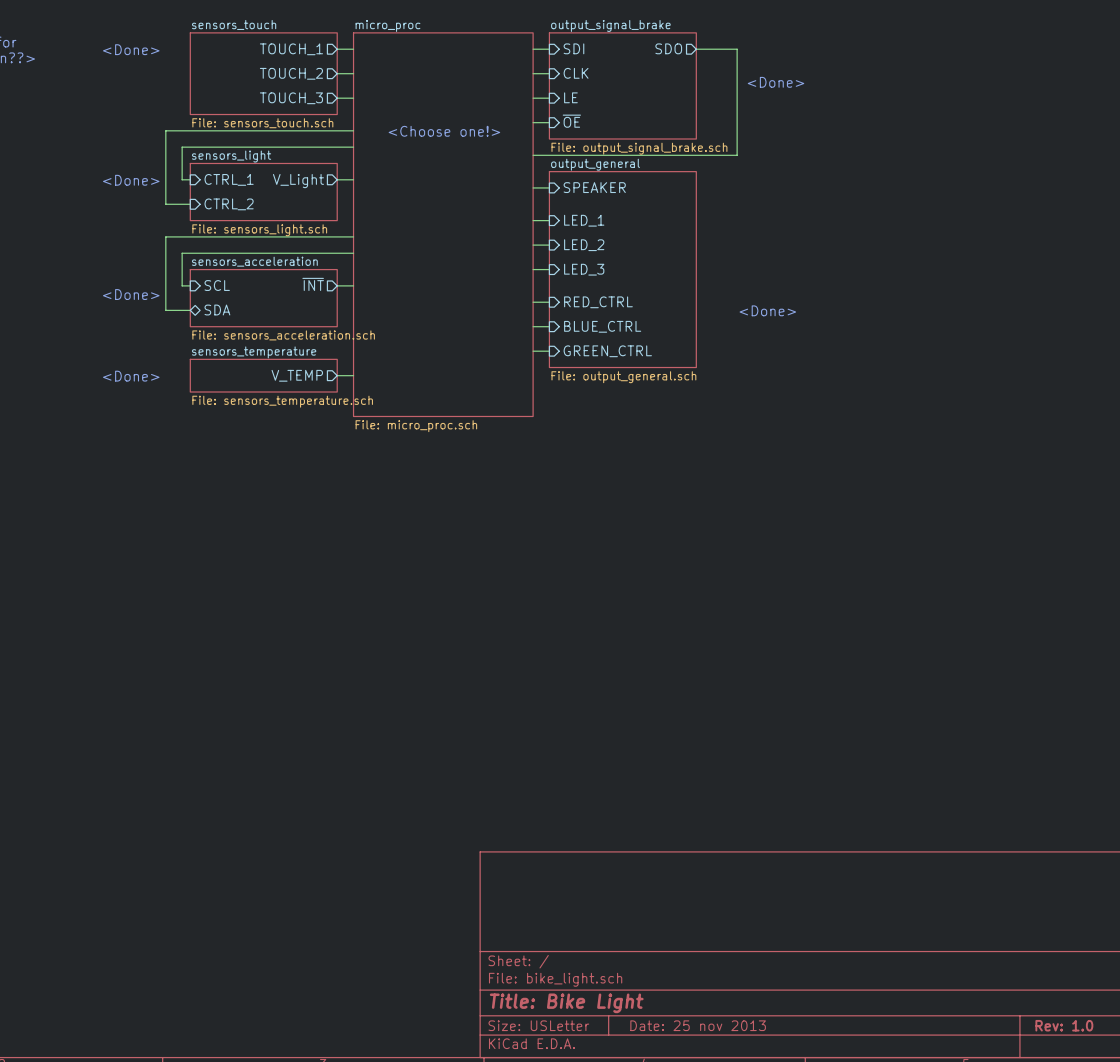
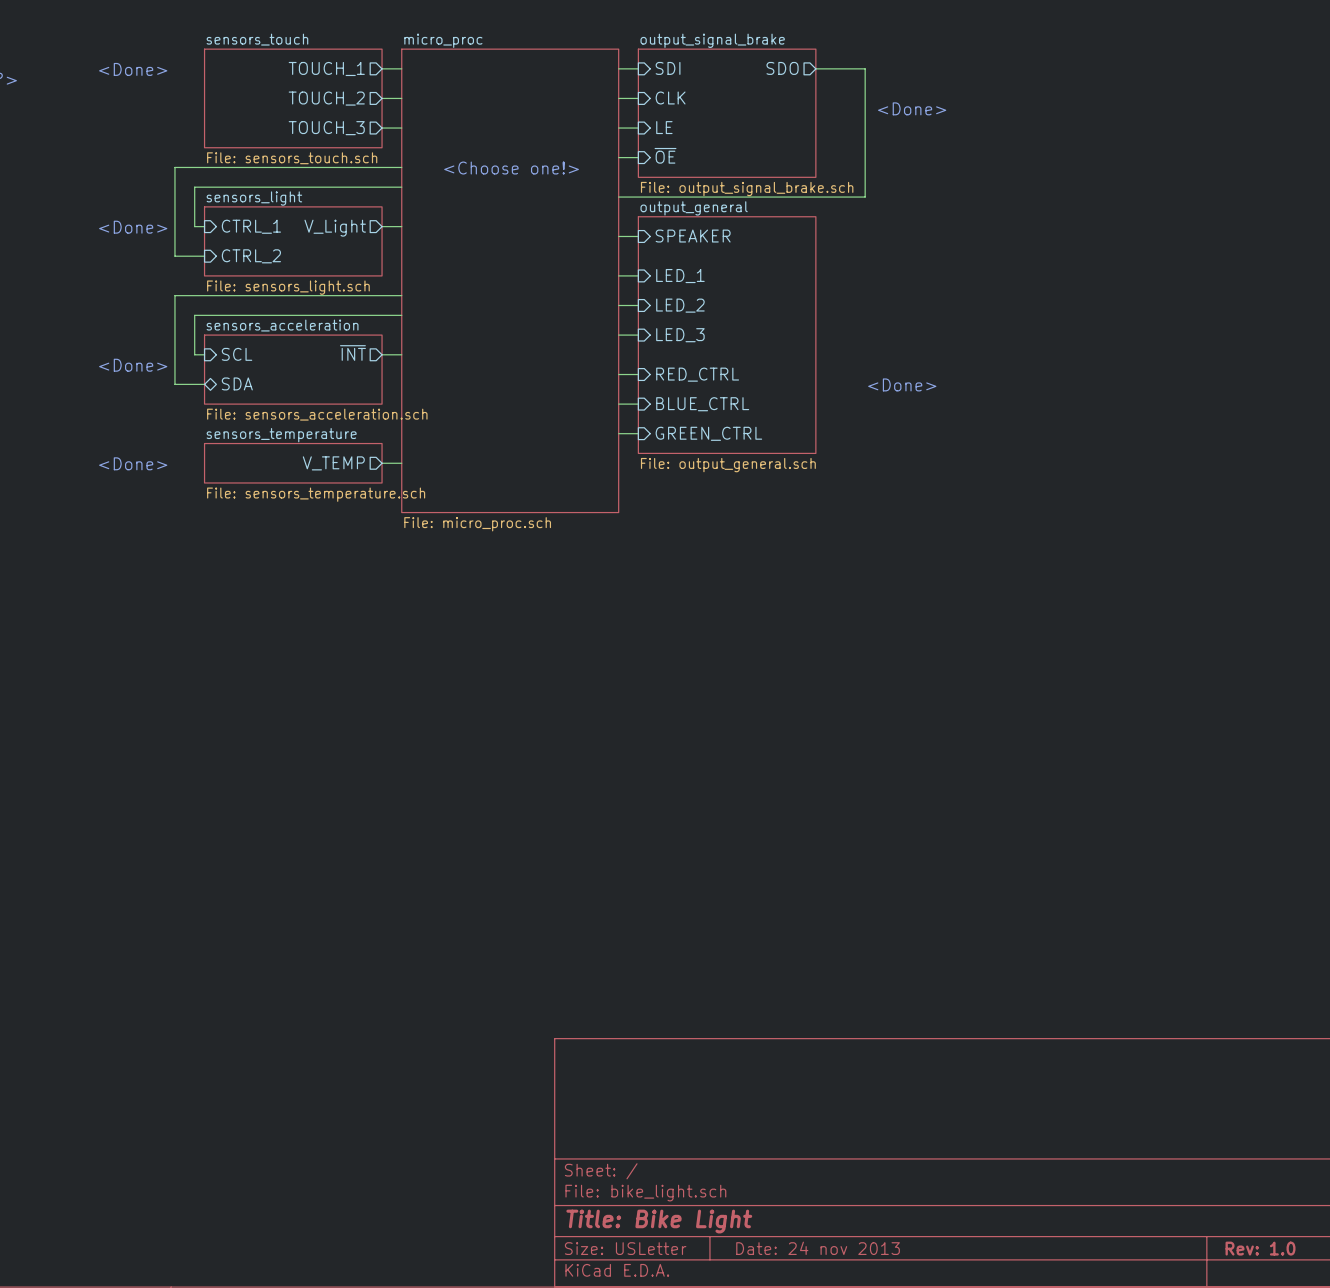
title block: Date: 25 nov 2013 (698, 1025) -> Date: 24 nov 2013 (818, 1248)

